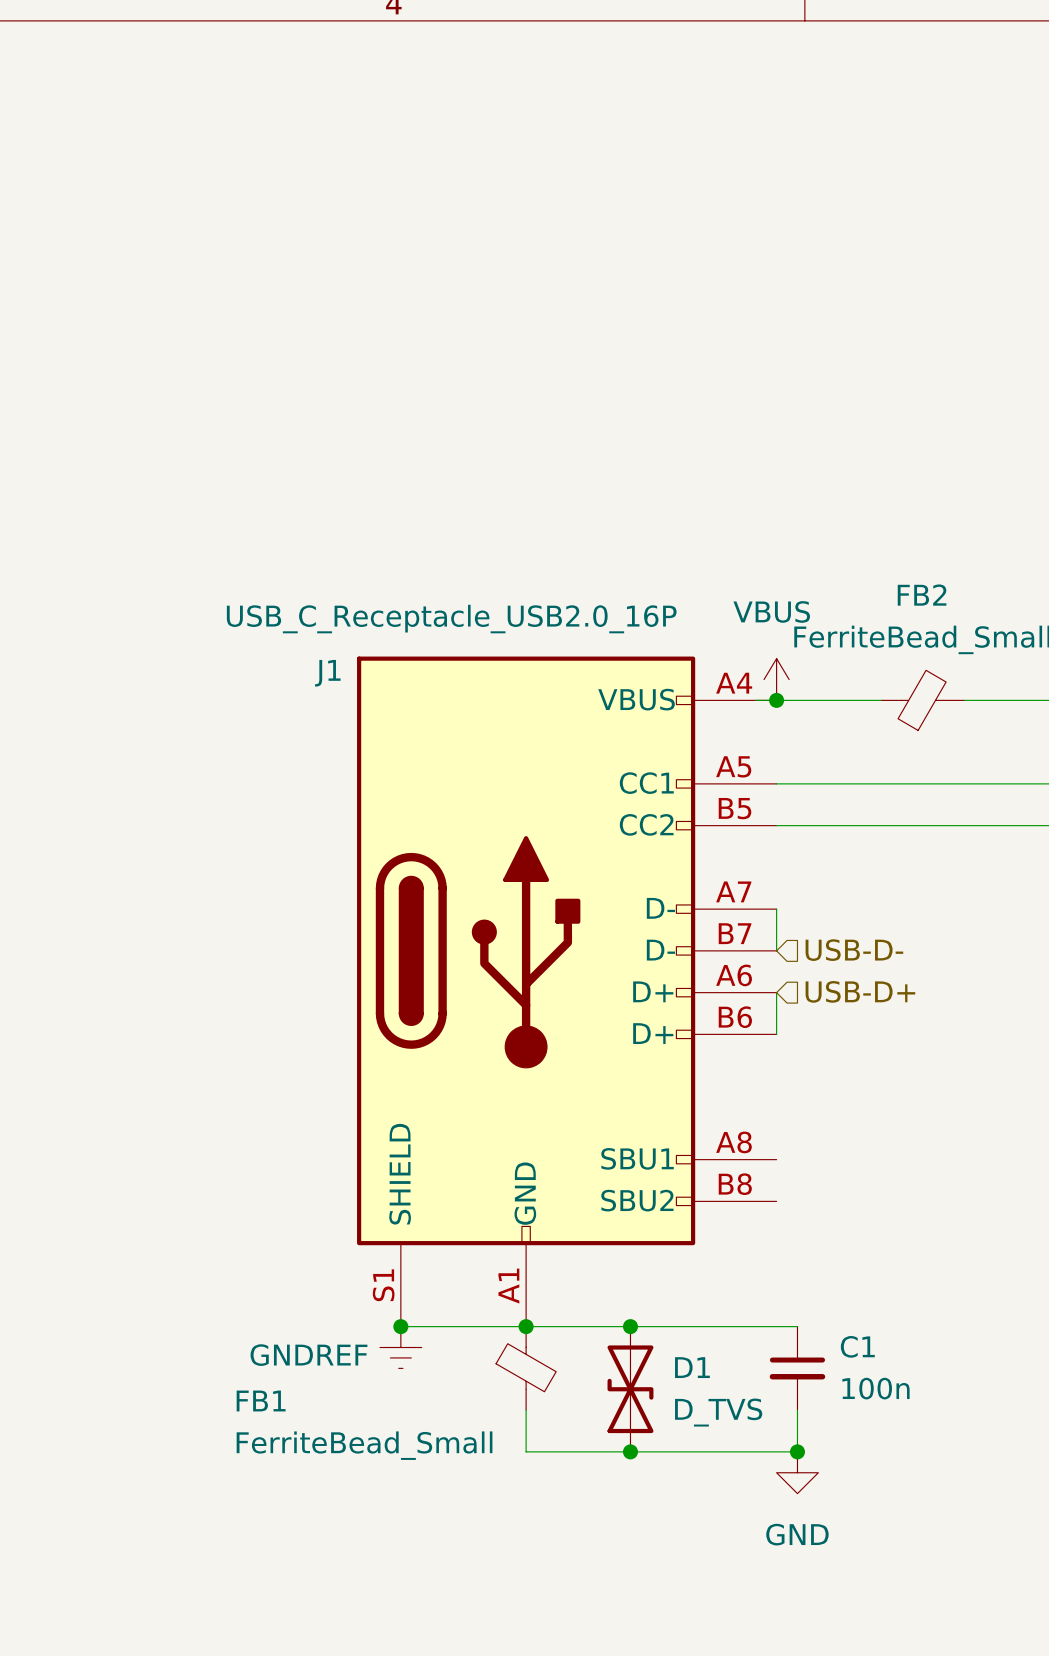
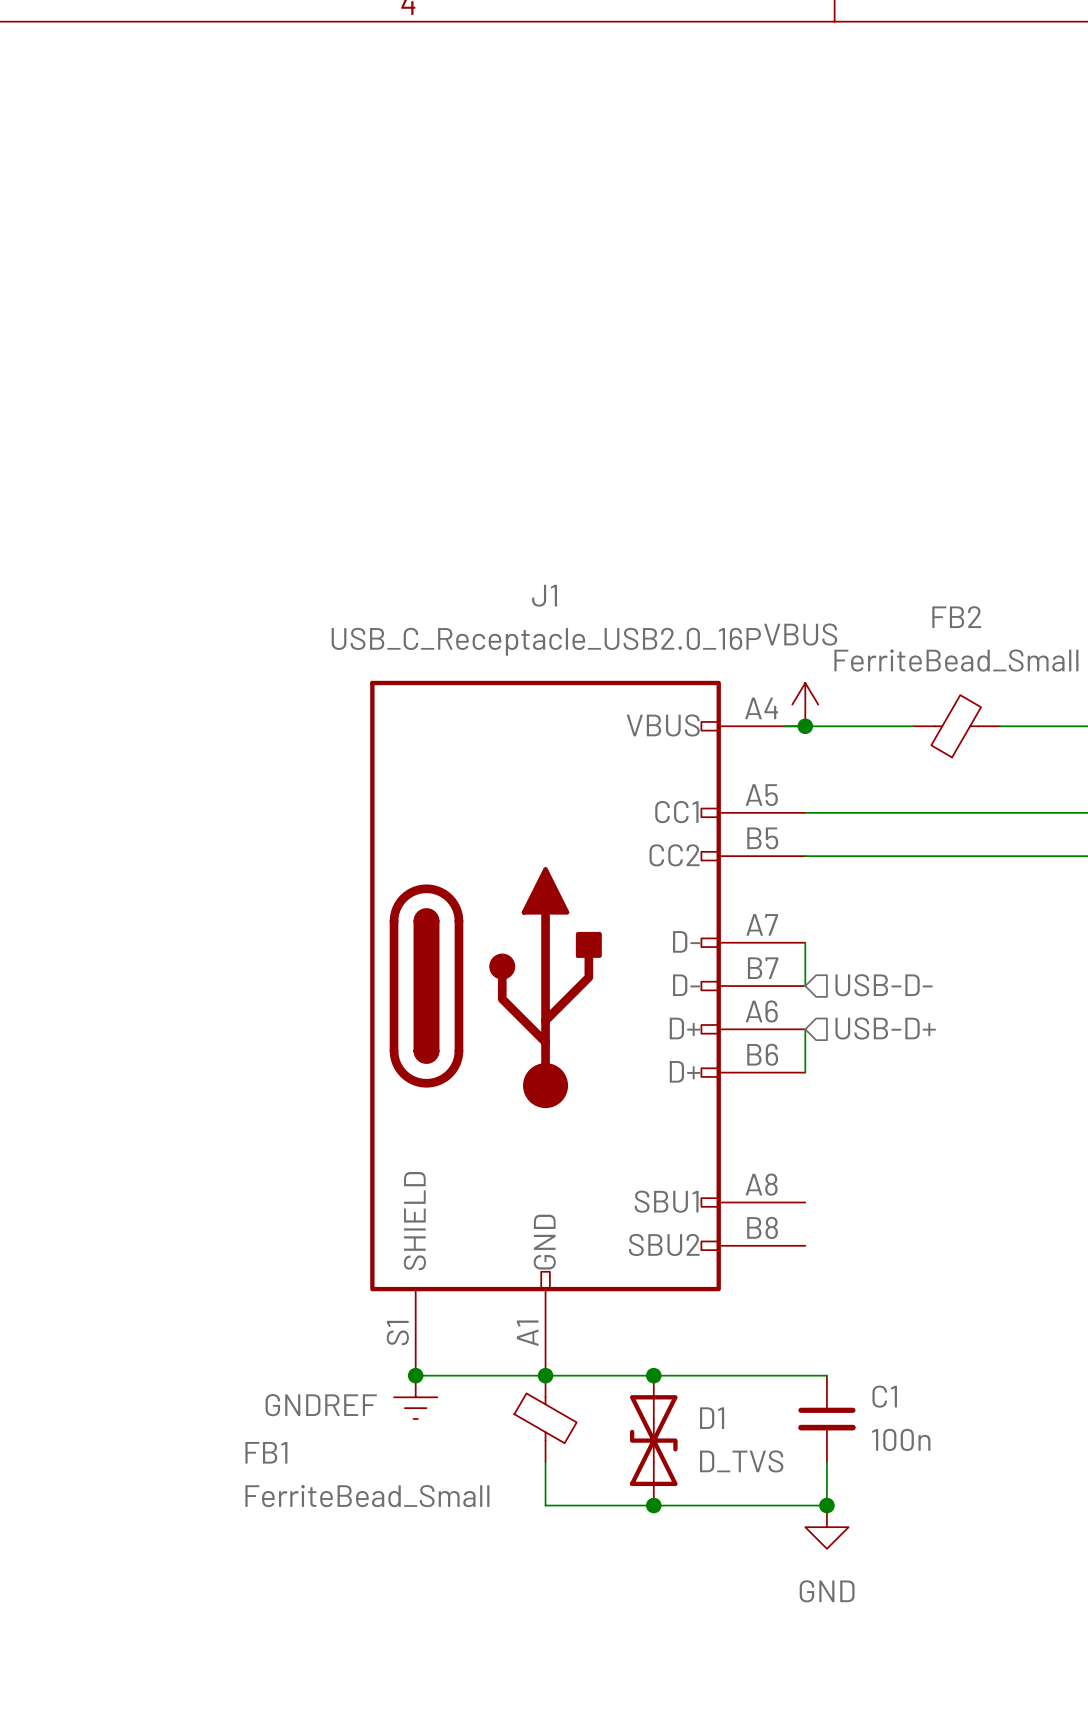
J1 value position: USB_C_Receptacle_USB2.0_16P (451, 619) -> USB_C_Receptacle_USB2.0_16P (546, 641)
J1 name position: J1 (327, 673) -> J1 (544, 595)

